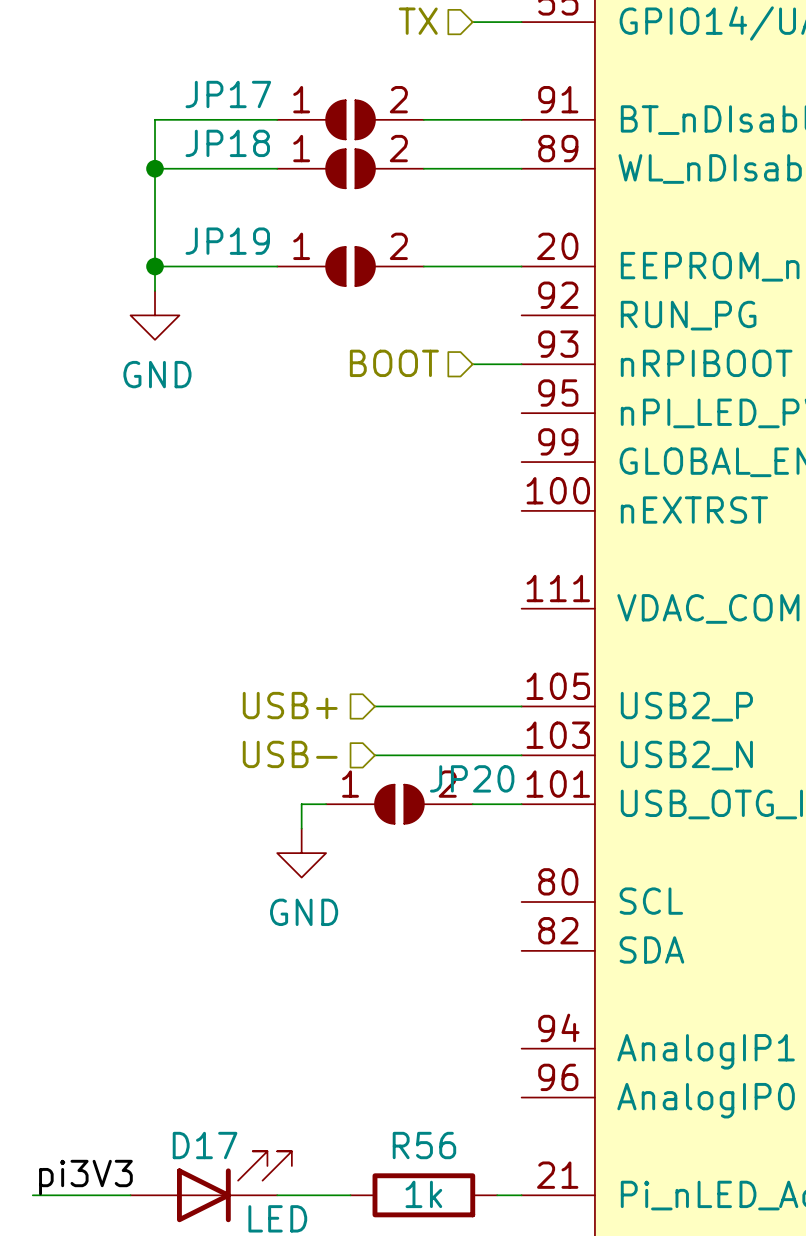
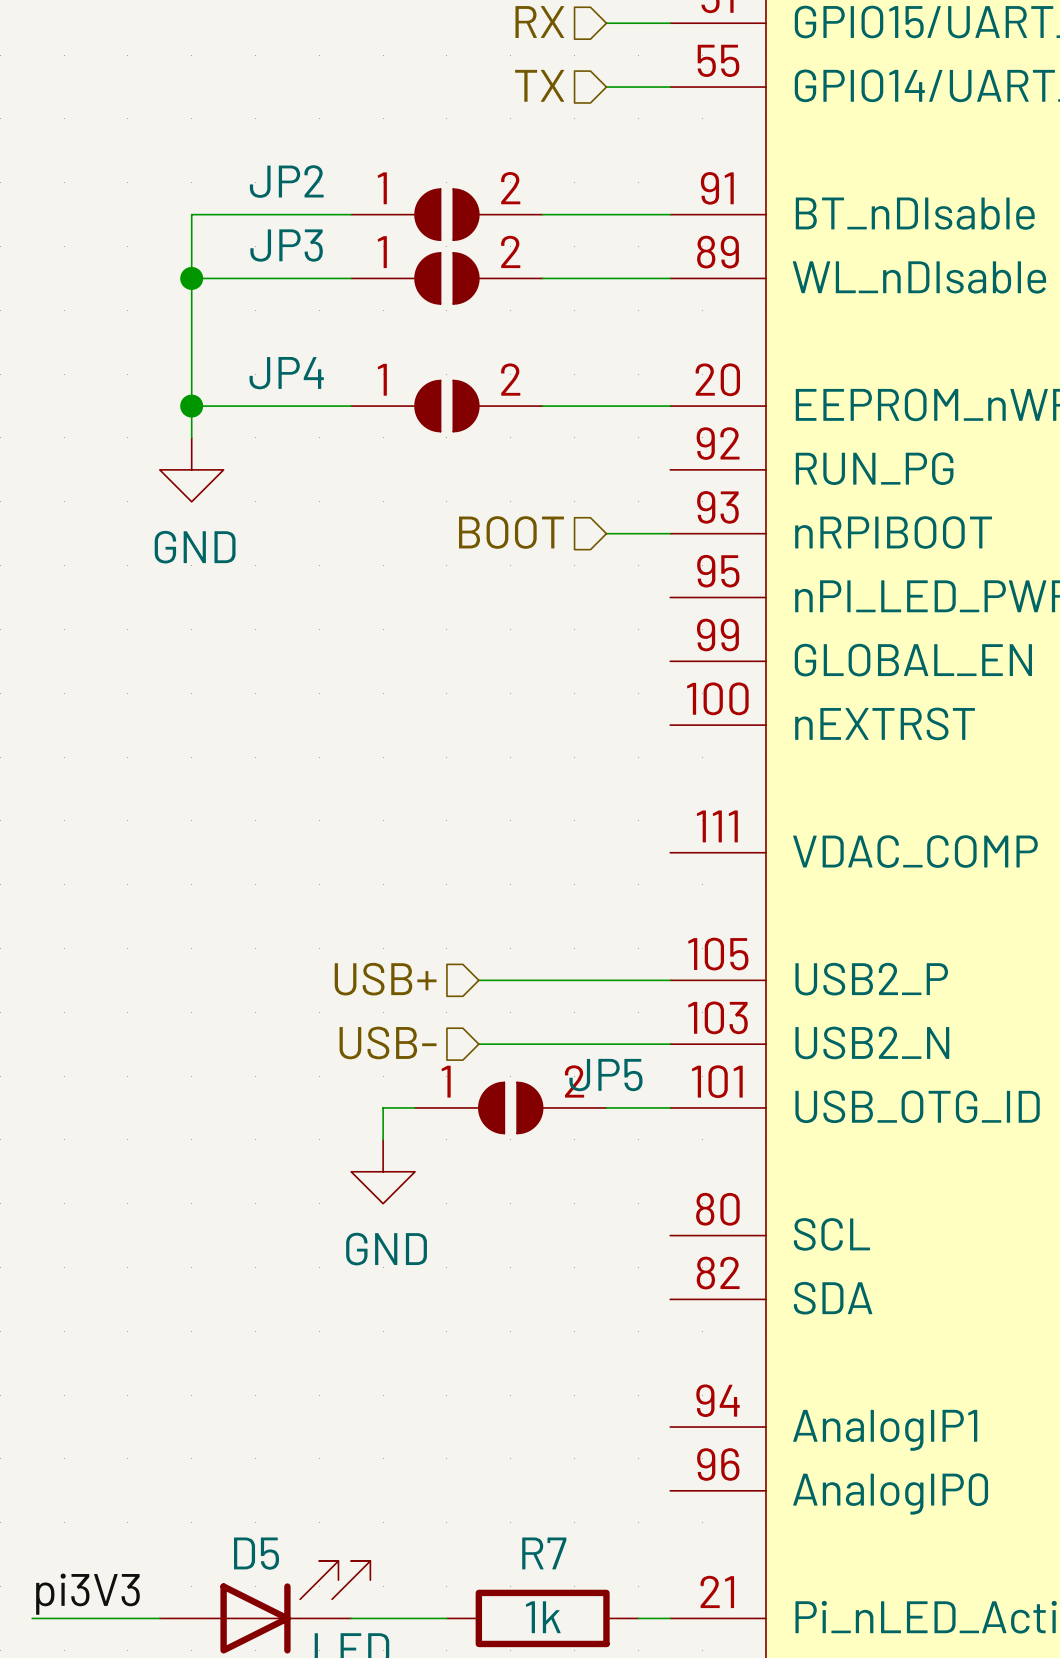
JP17 name: JP17 (228, 94) -> JP2 (286, 181)
JP18 name: JP18 (227, 143) -> JP3 (286, 245)
JP19 name: JP19 (227, 241) -> JP4 (286, 373)
JP20 name: JP20 (472, 778) -> JP5 (605, 1075)
D17 name: D17 (205, 1145) -> D5 (256, 1553)
R56 name: R56 (424, 1145) -> R7 (544, 1553)

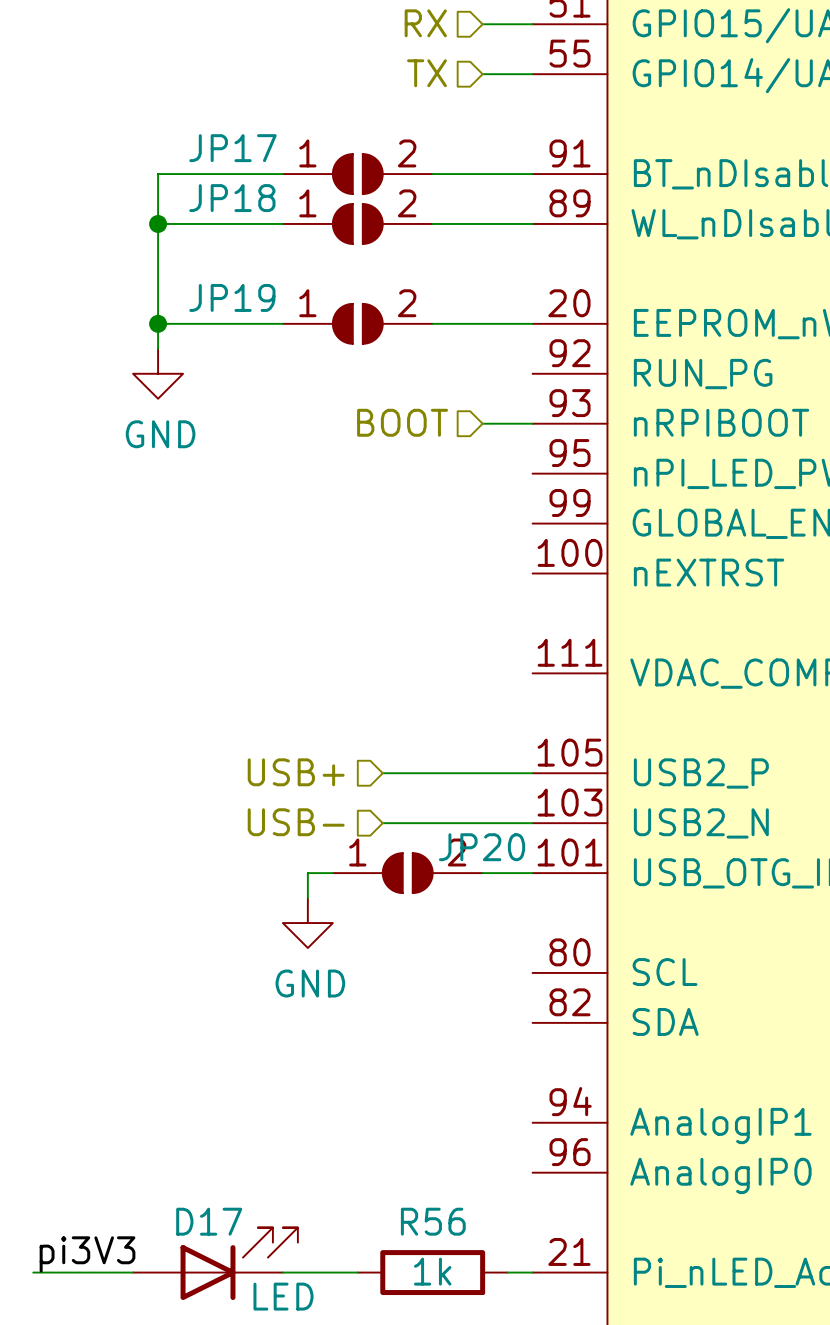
JP2 name: JP2 (286, 181) -> JP17 (232, 148)
JP3 name: JP3 (286, 245) -> JP18 (232, 198)
JP4 name: JP4 (286, 373) -> JP19 (232, 297)
JP5 name: JP5 (605, 1075) -> JP20 (482, 847)
D5 name: D5 (256, 1553) -> D17 (209, 1221)
R7 name: R7 (544, 1553) -> R56 (433, 1221)

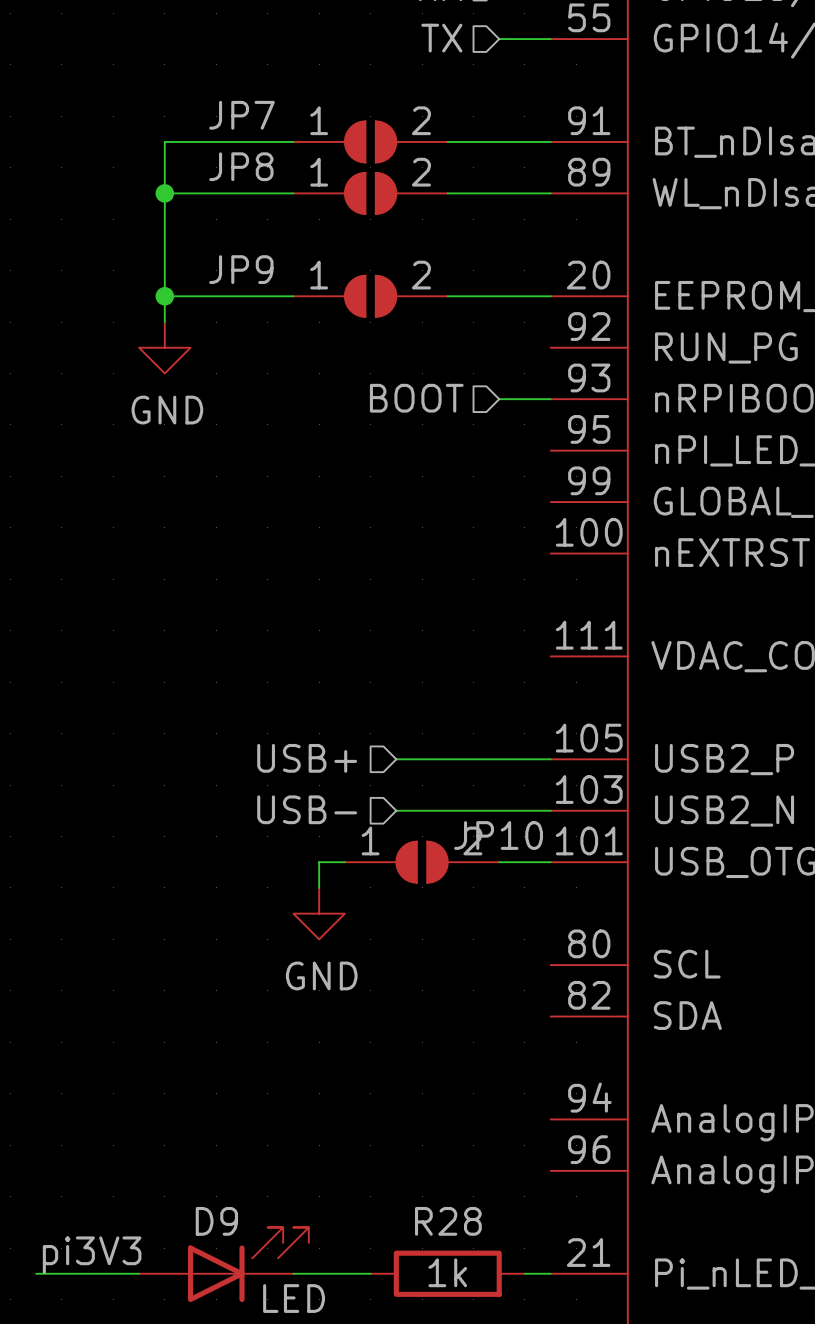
JP17 name: JP17 (232, 148) -> JP7 (241, 115)
JP18 name: JP18 (232, 198) -> JP8 (241, 166)
JP19 name: JP19 (232, 297) -> JP9 (241, 269)
JP20 name: JP20 (482, 847) -> JP10 (498, 835)
D17 name: D17 (209, 1221) -> D9 (216, 1221)
R56 name: R56 (433, 1221) -> R28 (448, 1221)

